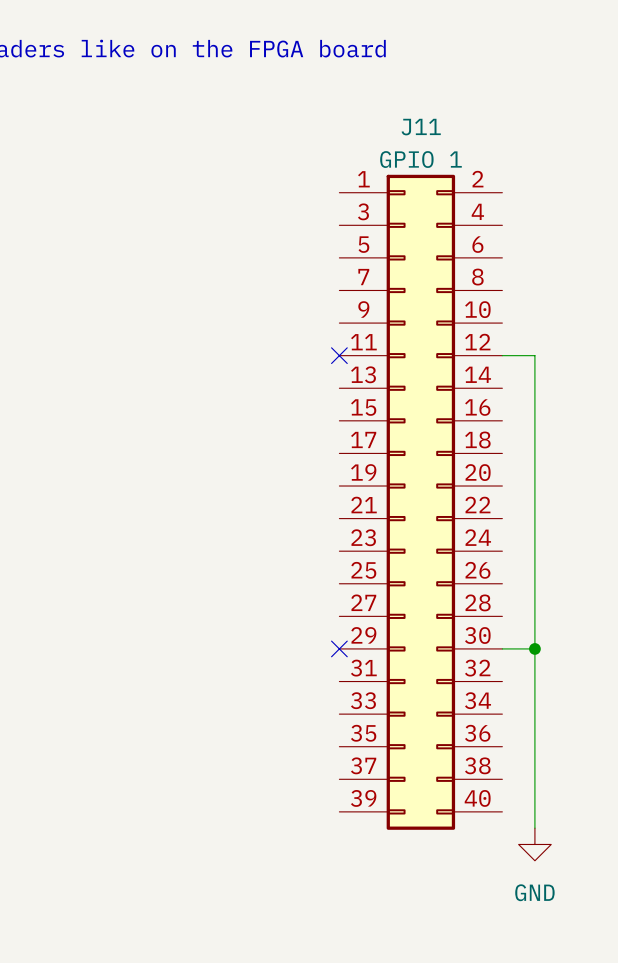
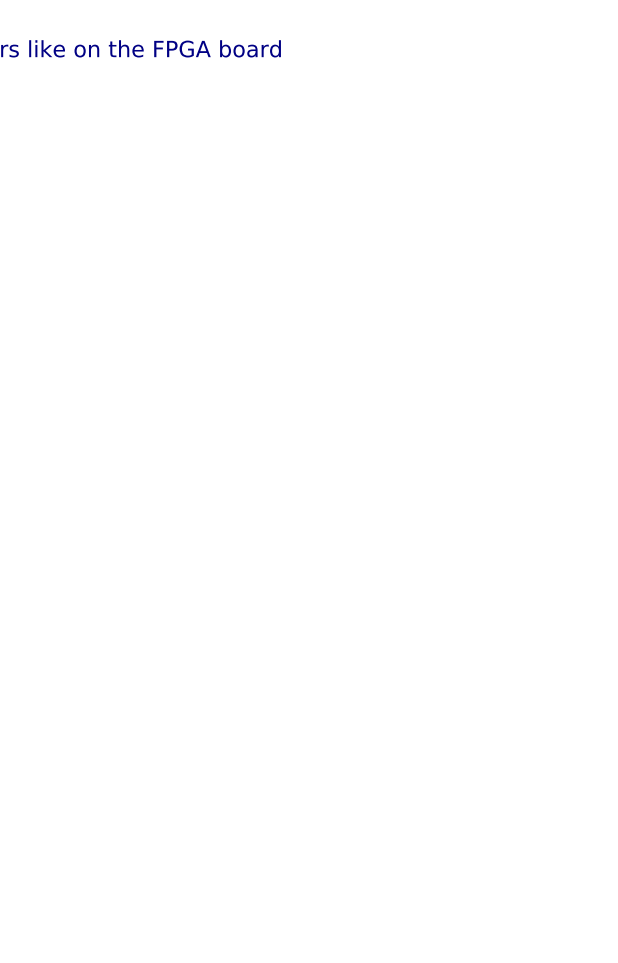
no-connect mark: (339, 355) -> none
wire: (502, 355) (534, 355) (534, 828) -> none
J11: GPIO 1 (420, 502) -> none
no-connect mark: (339, 648) -> none
wire: (502, 648) (534, 648) -> none
junction: (534, 648) -> none
power symbol: GND (534, 844) -> none

